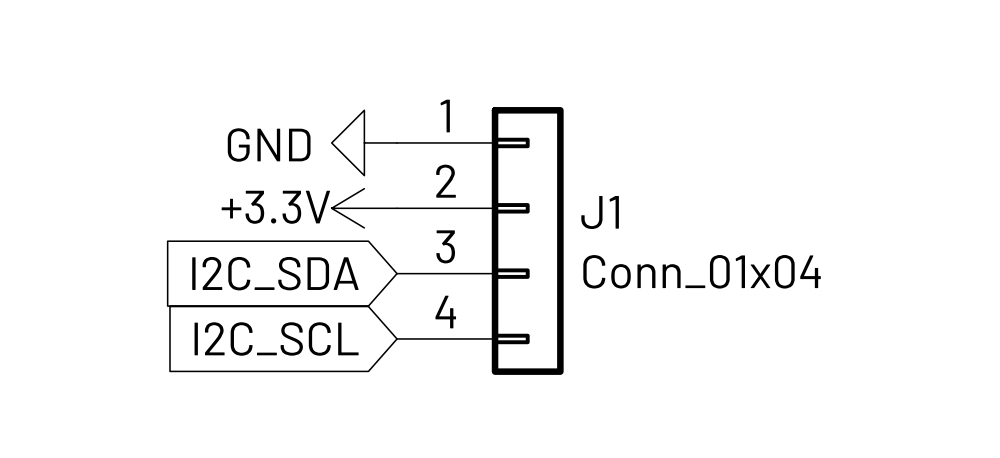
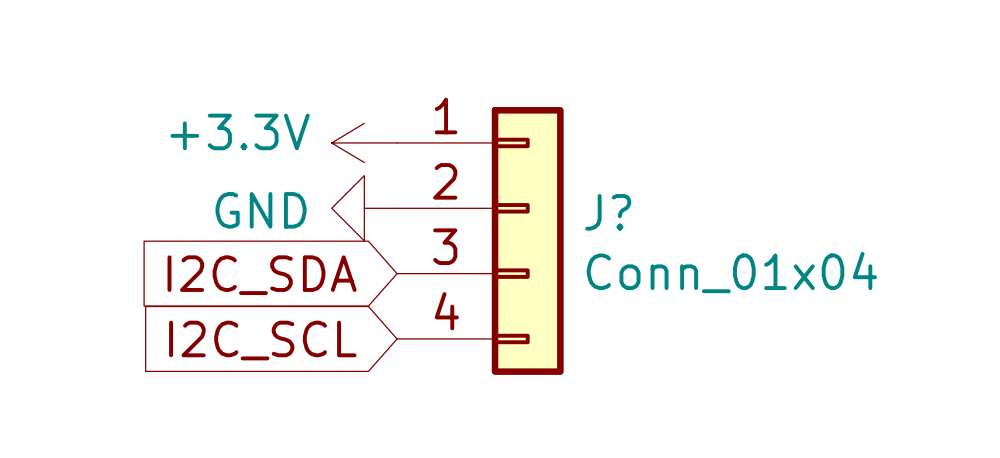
power symbol: GND (364, 142) -> +3.3V (364, 142)
power symbol: +3.3V (364, 208) -> GND (364, 208)
J1 name: J1 (600, 212) -> J? (608, 212)

